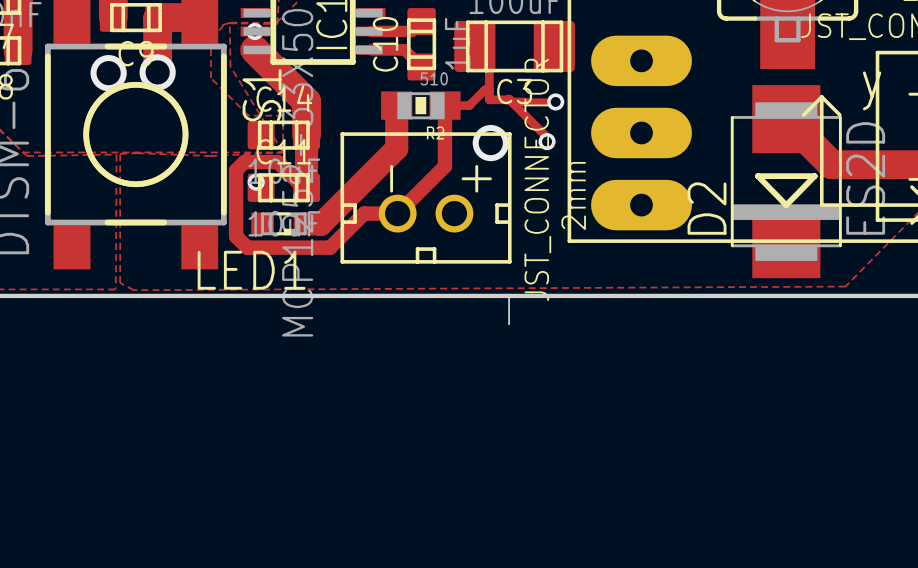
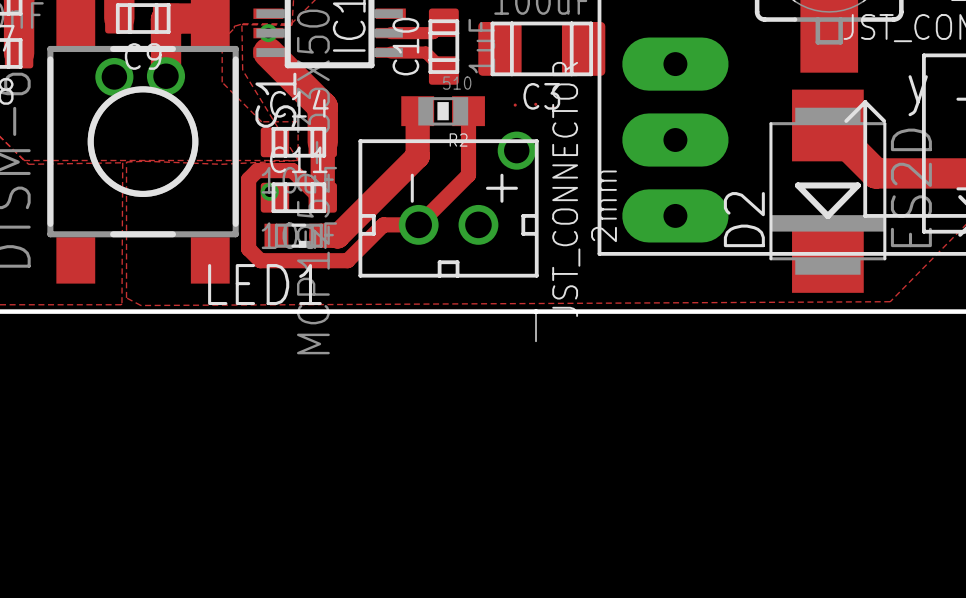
track: (474, 46) (489, 60) (489, 99) (508, 99) (547, 137) (547, 141) -> none
track: (489, 89) (485, 89) (469, 105) (444, 105) -> none
track: (511, 101) (555, 101) -> none
via: (555, 101) -> none
via: (547, 141) -> none

